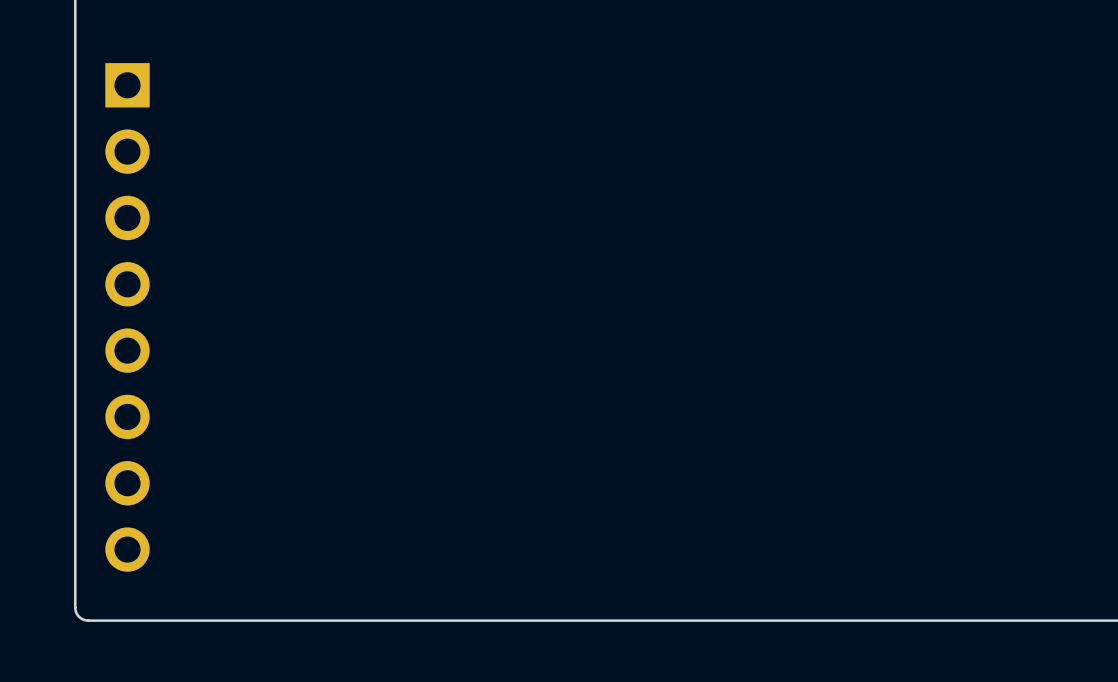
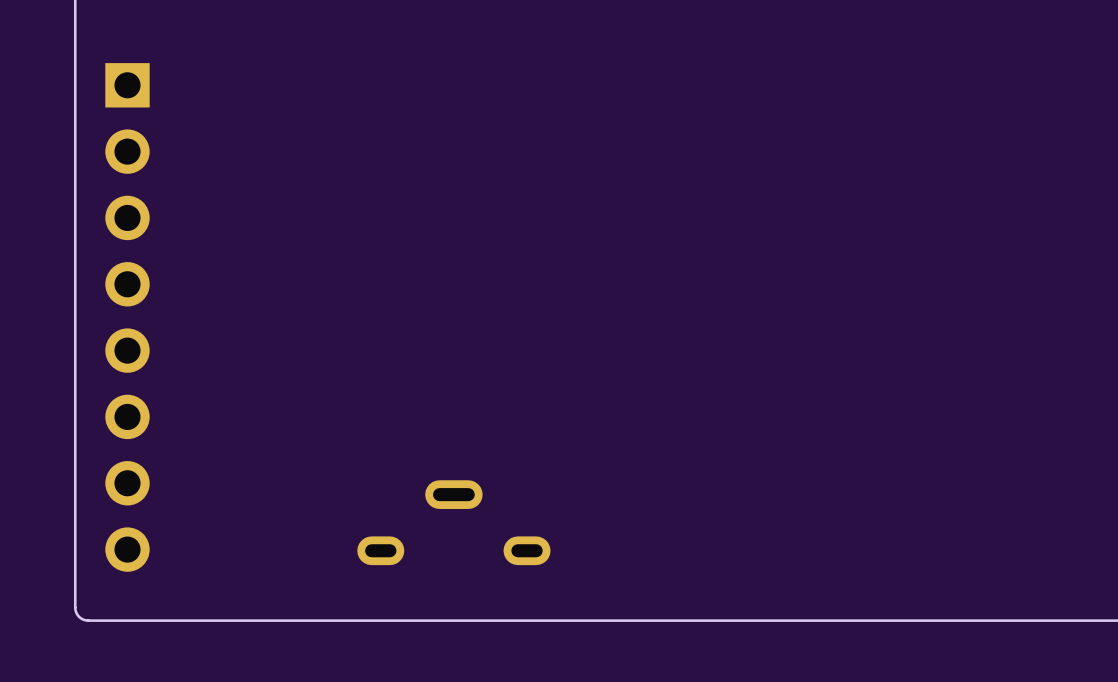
part: none -> (453, 522)

